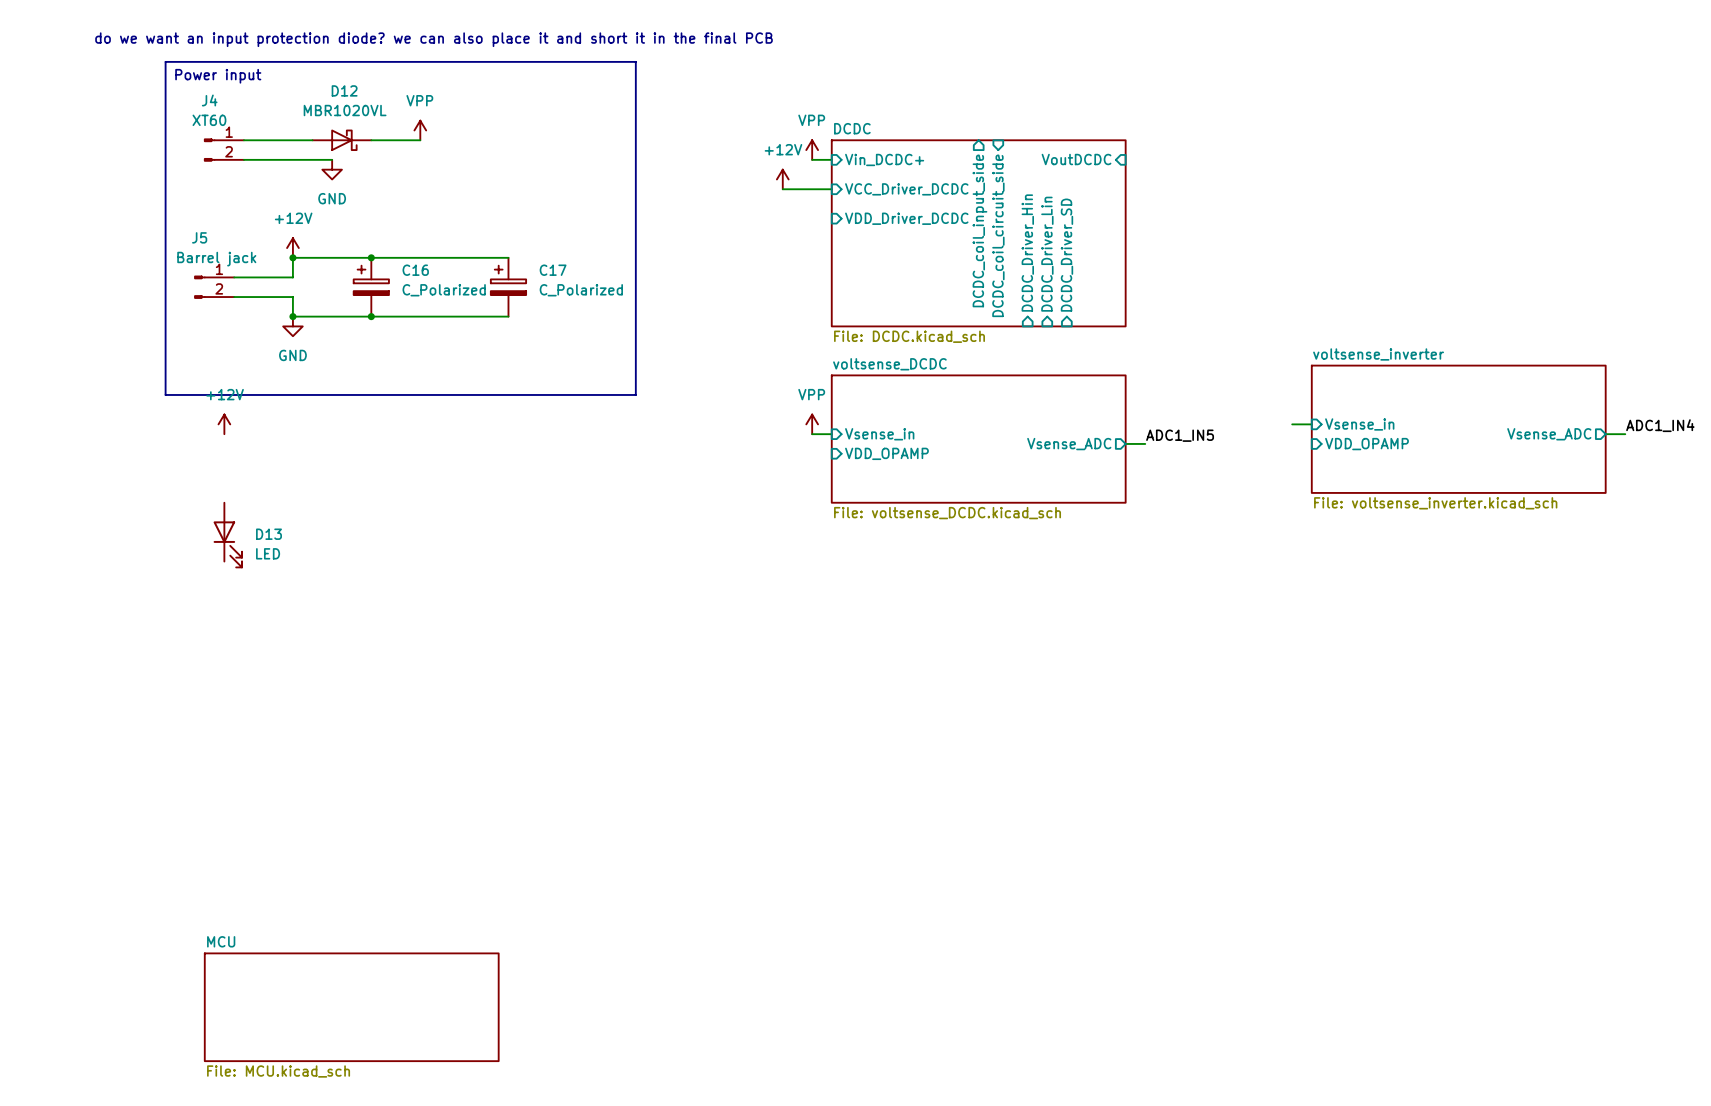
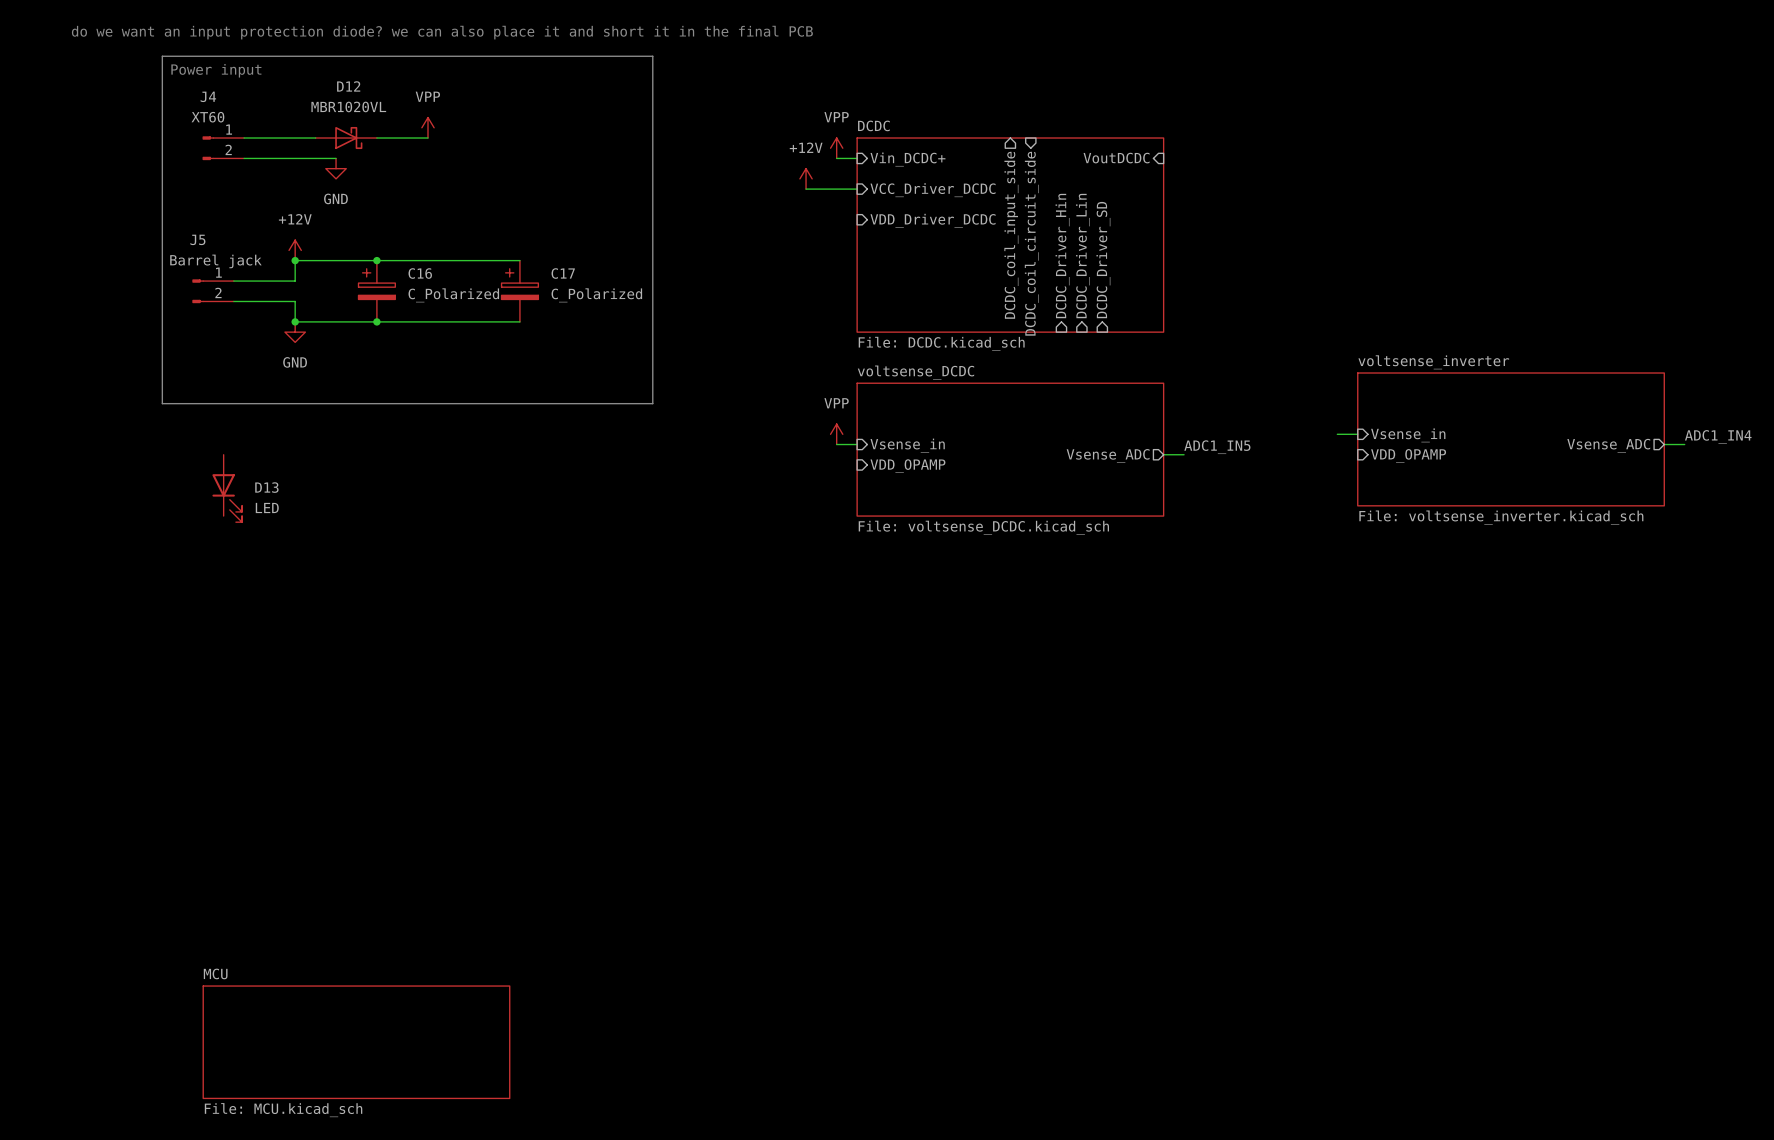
power symbol: +12V (224, 424) -> none
D13 position: (227, 535) -> (227, 488)

